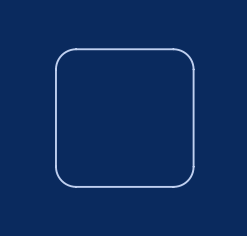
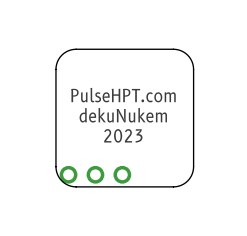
text: none -> PulseHPT.com (123, 95)
text: none -> dekuNukem (123, 115)
text: none -> 2023 (123, 135)
part: none -> (95, 174)

